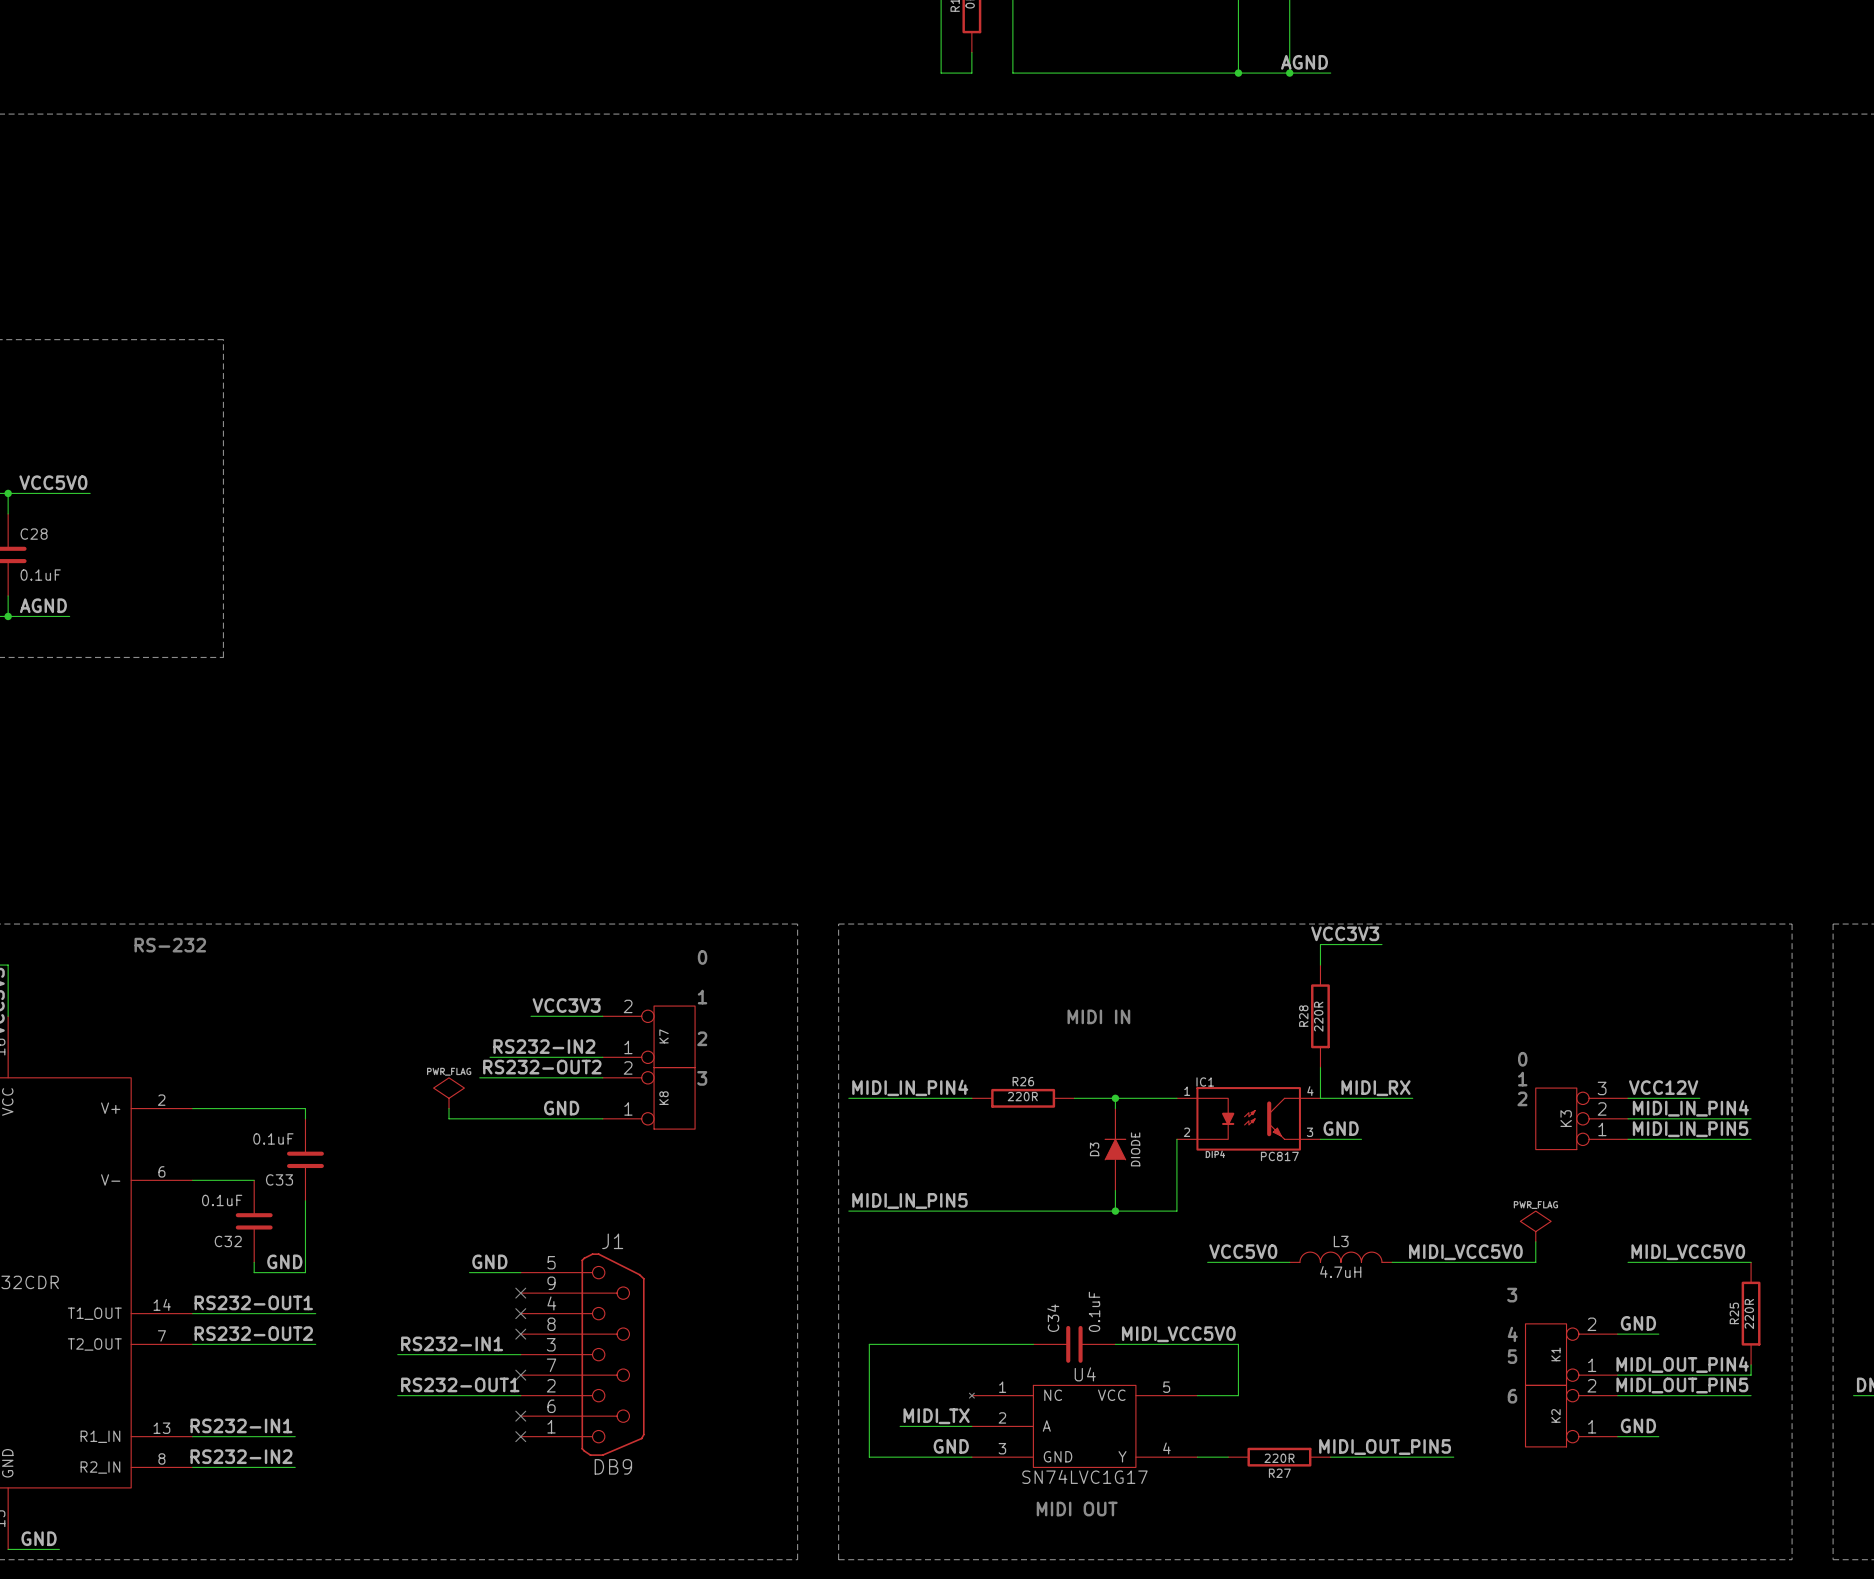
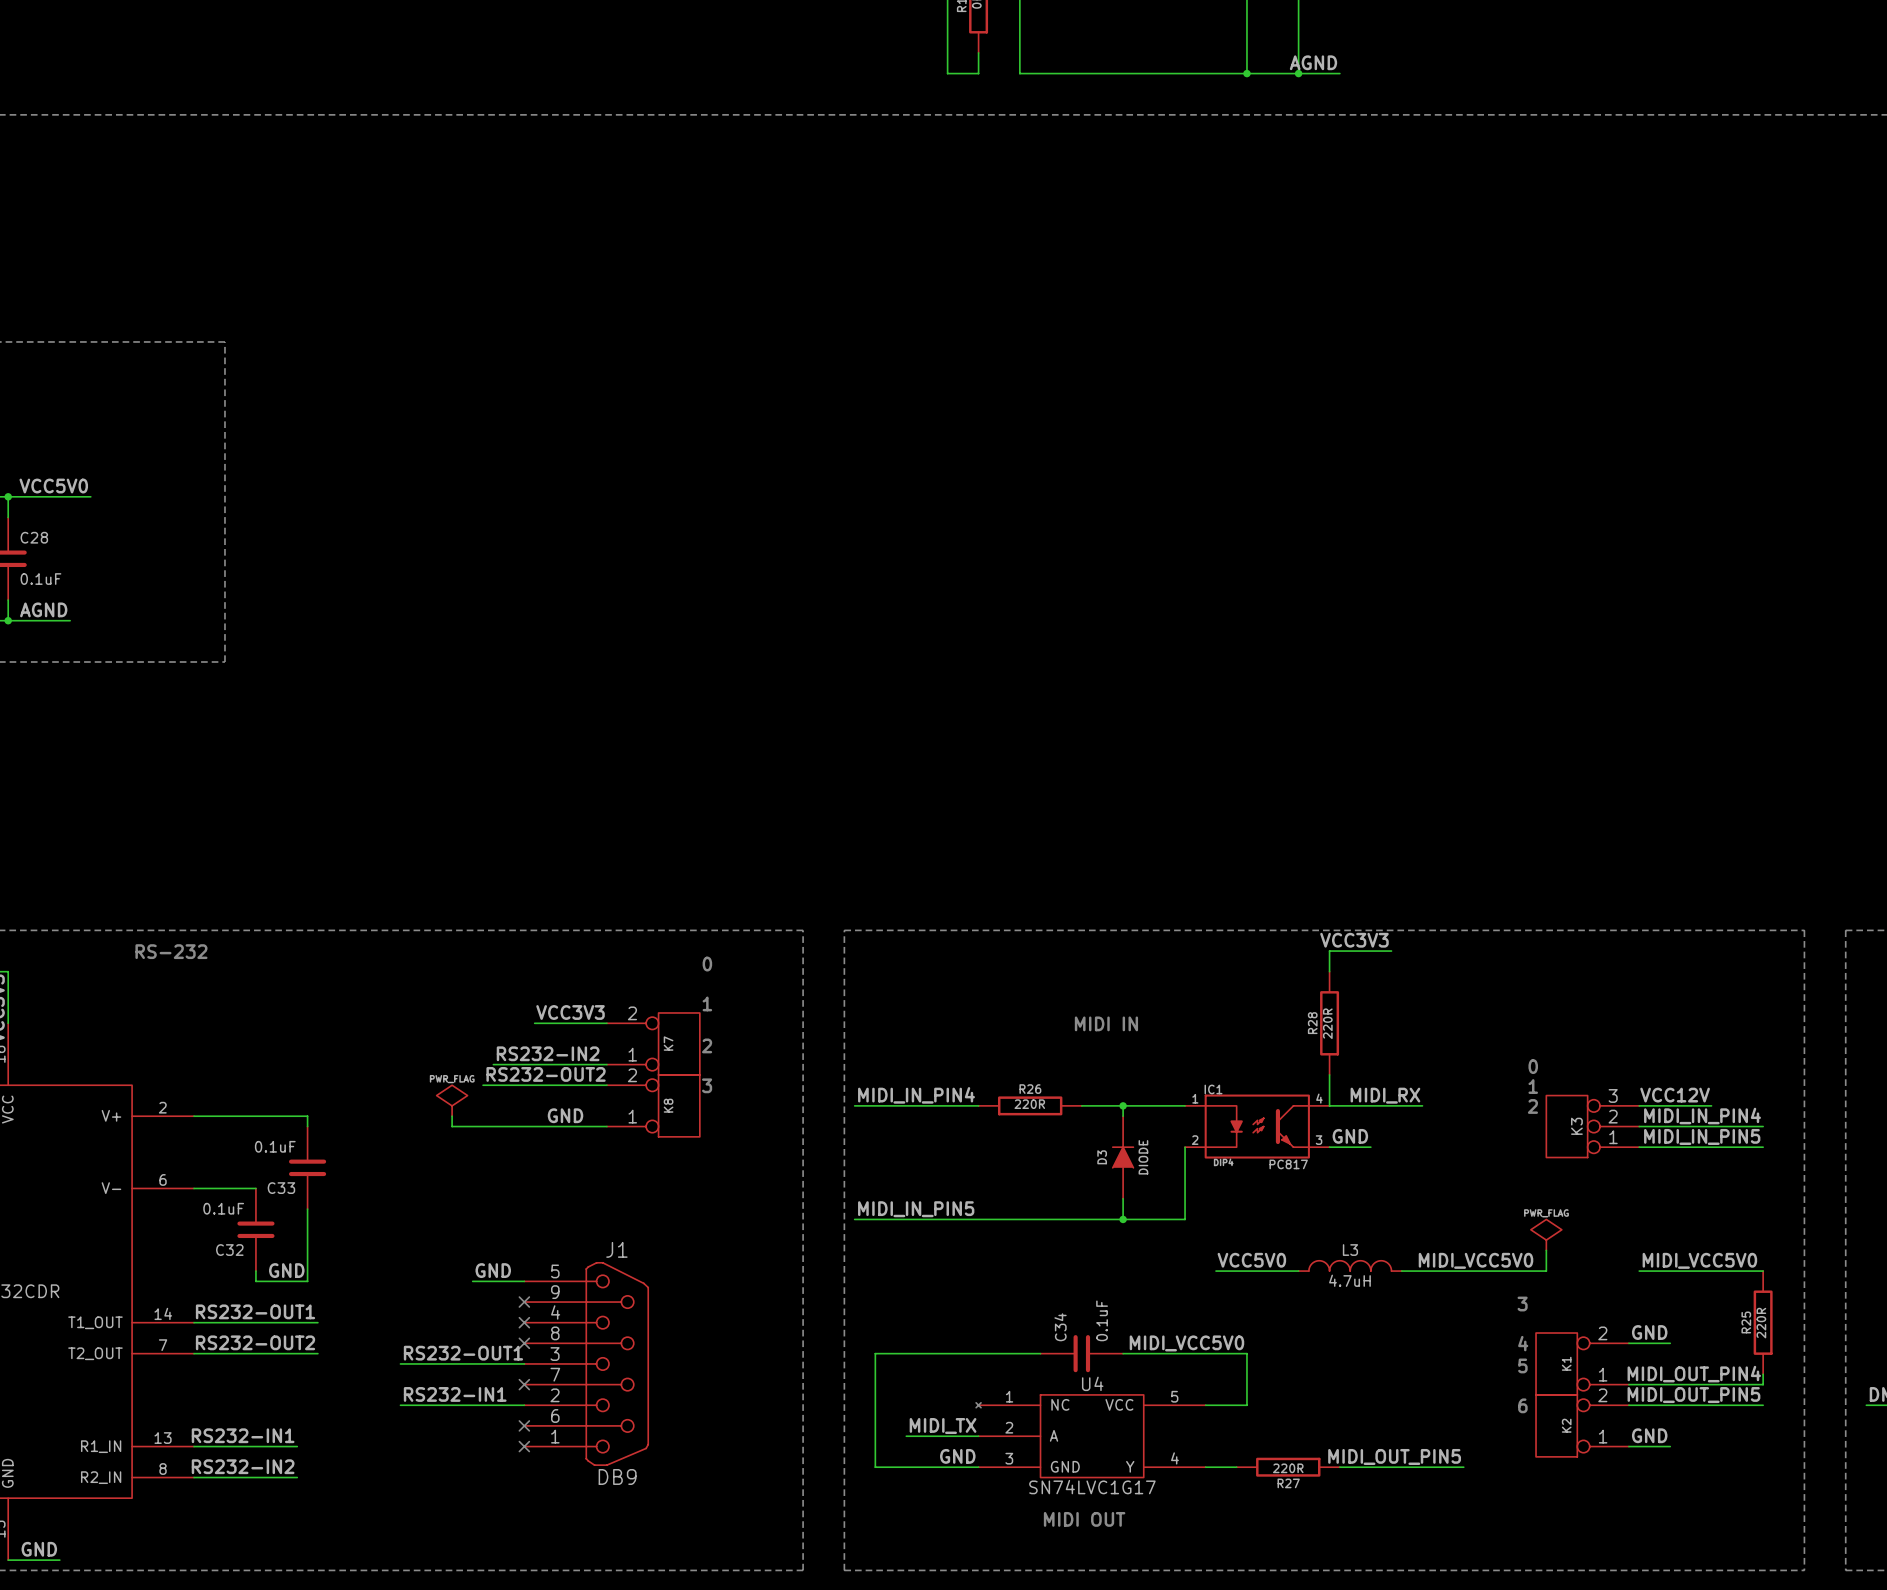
label: RS232-IN1 (452, 1343) -> RS232-OUT1 (463, 1353)
label: RS232-OUT1 (460, 1384) -> RS232-IN1 (455, 1394)

